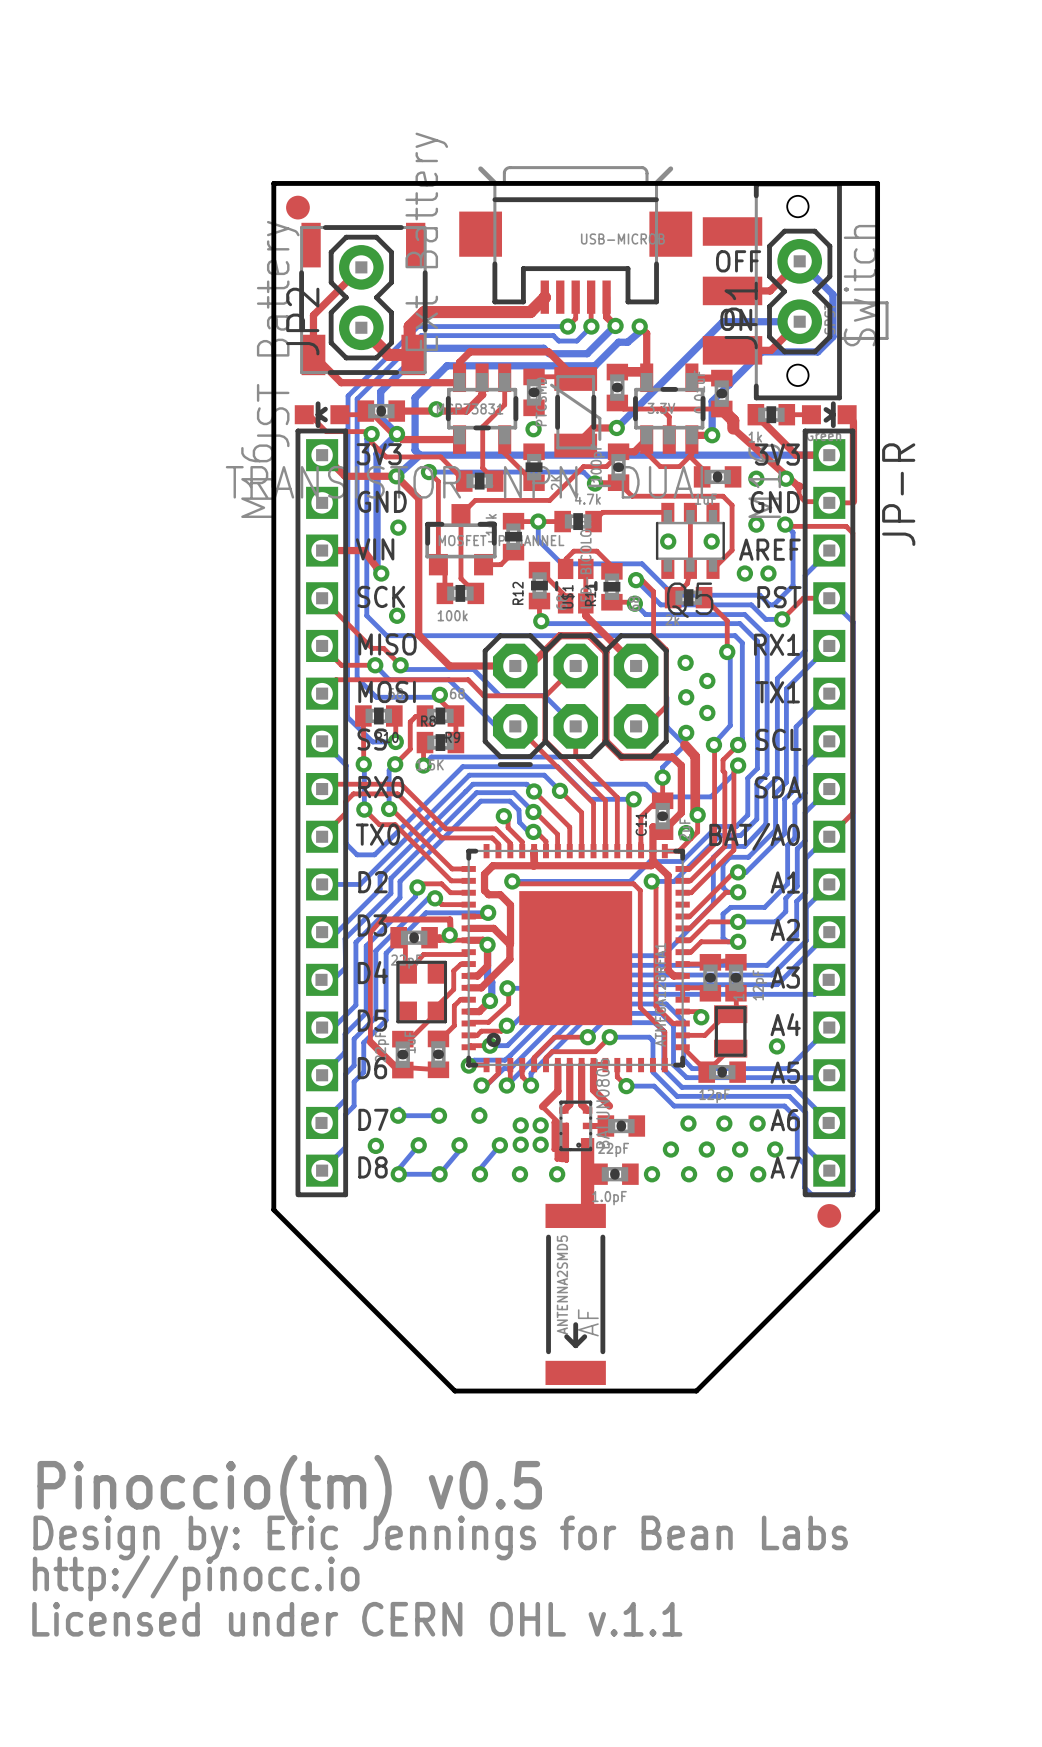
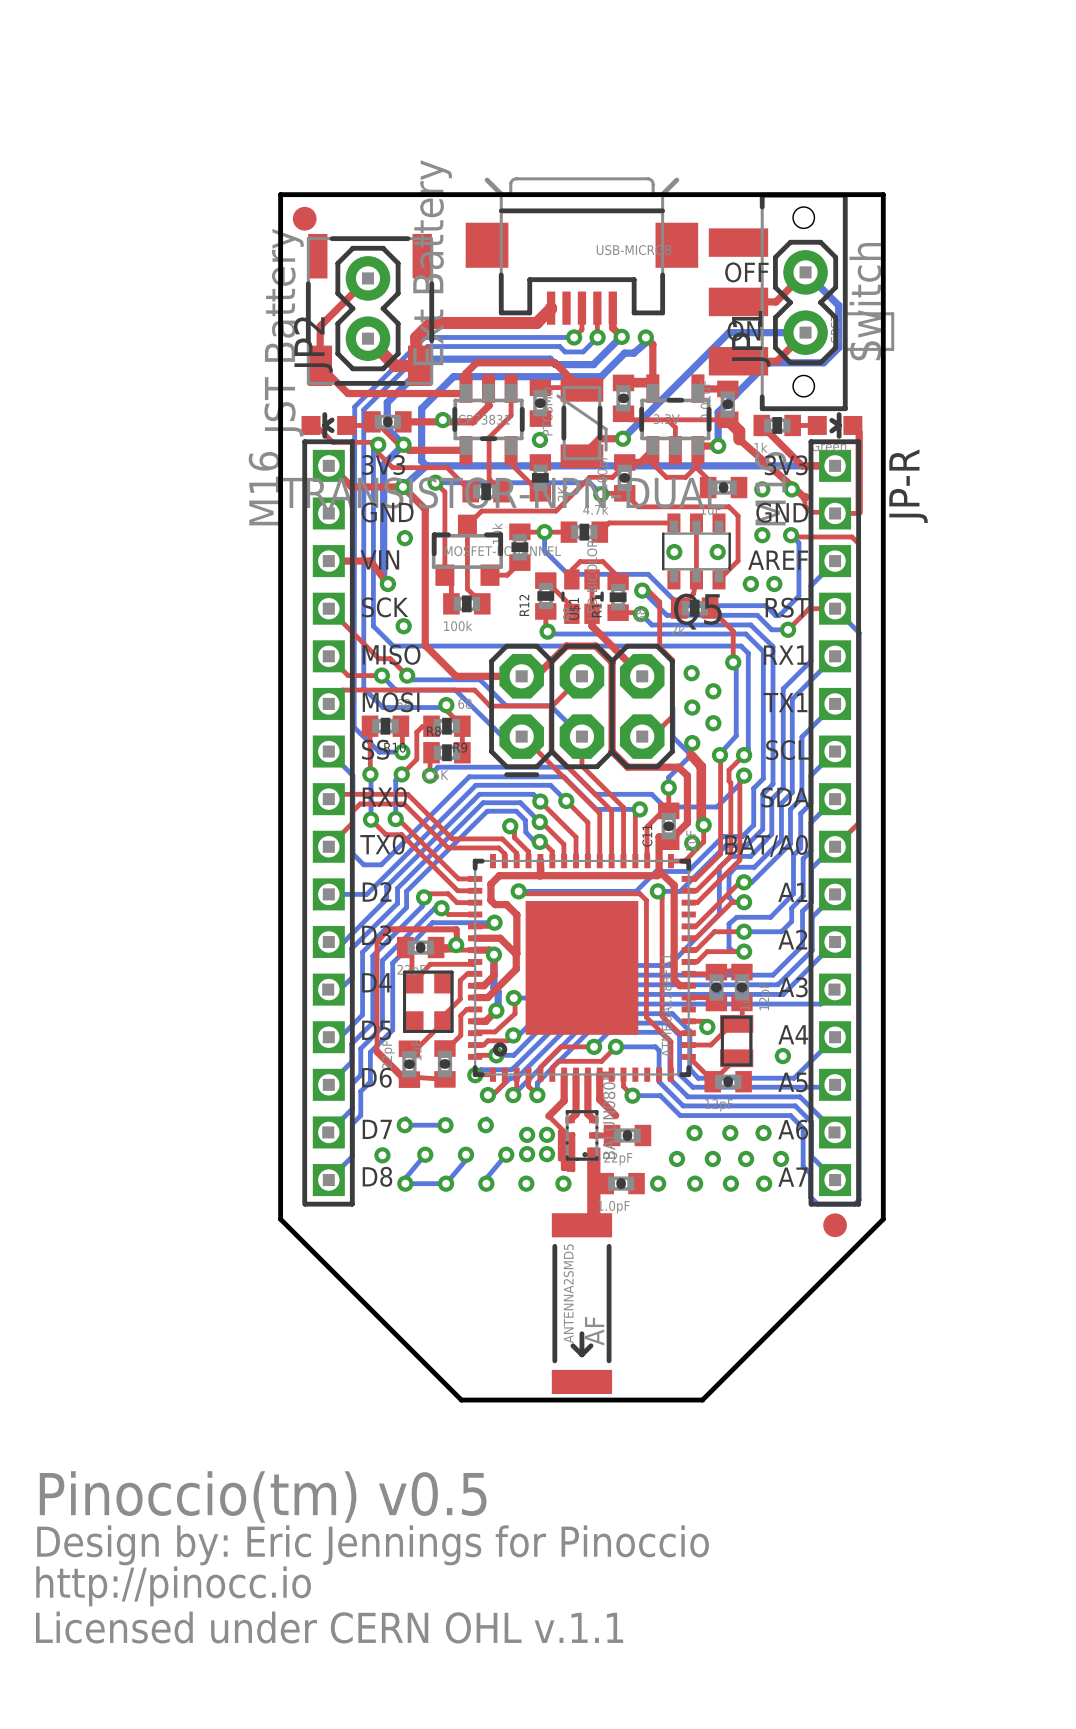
text: Design by: Eric Jennings for Bean Labs (440, 1537) -> Design by: Eric Jennings for Pinoccio (373, 1545)

